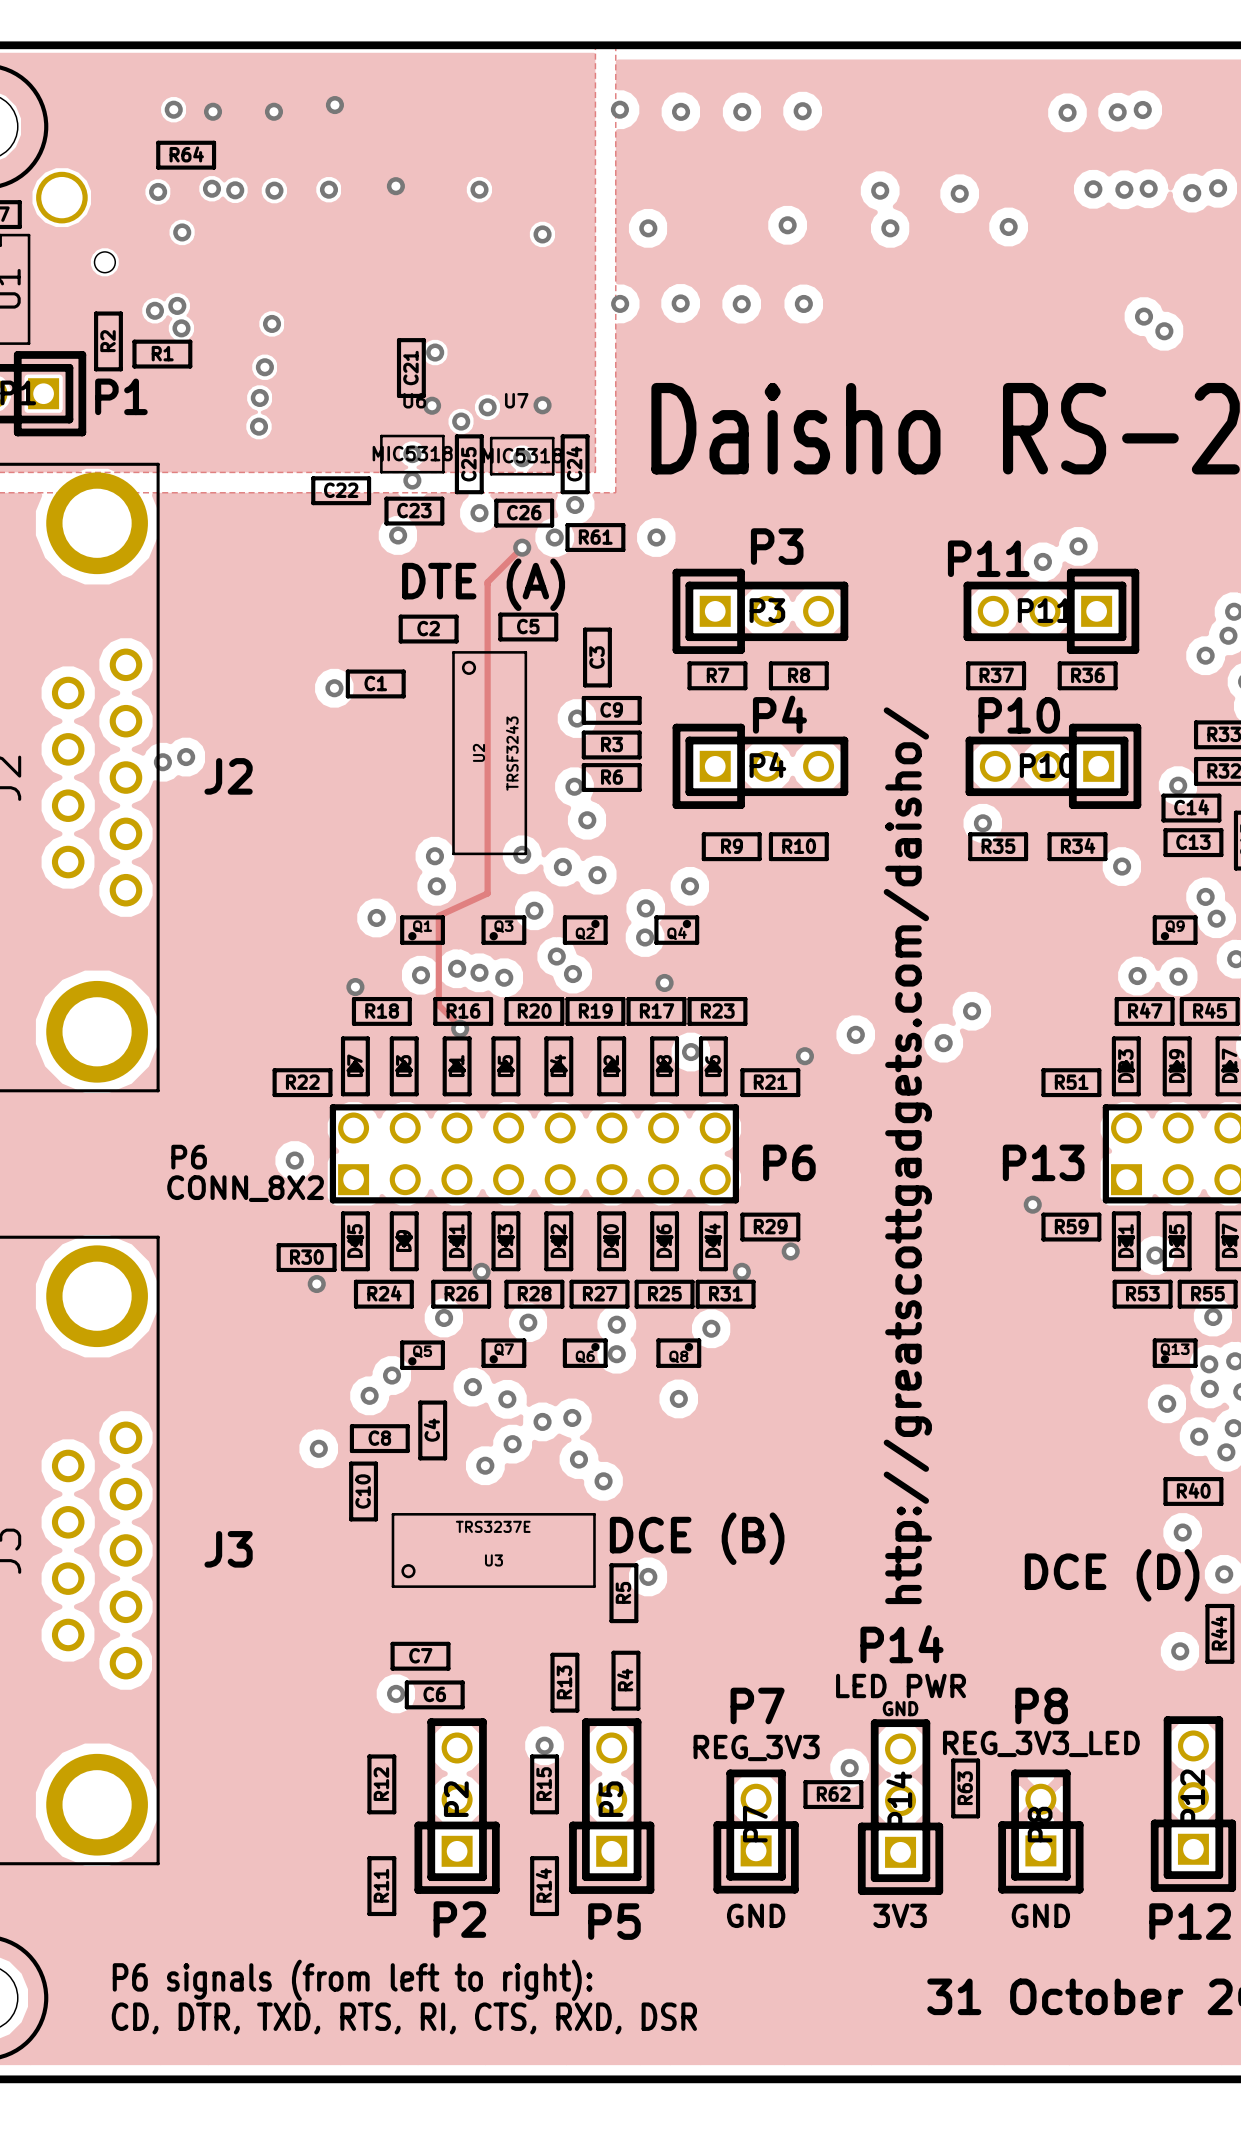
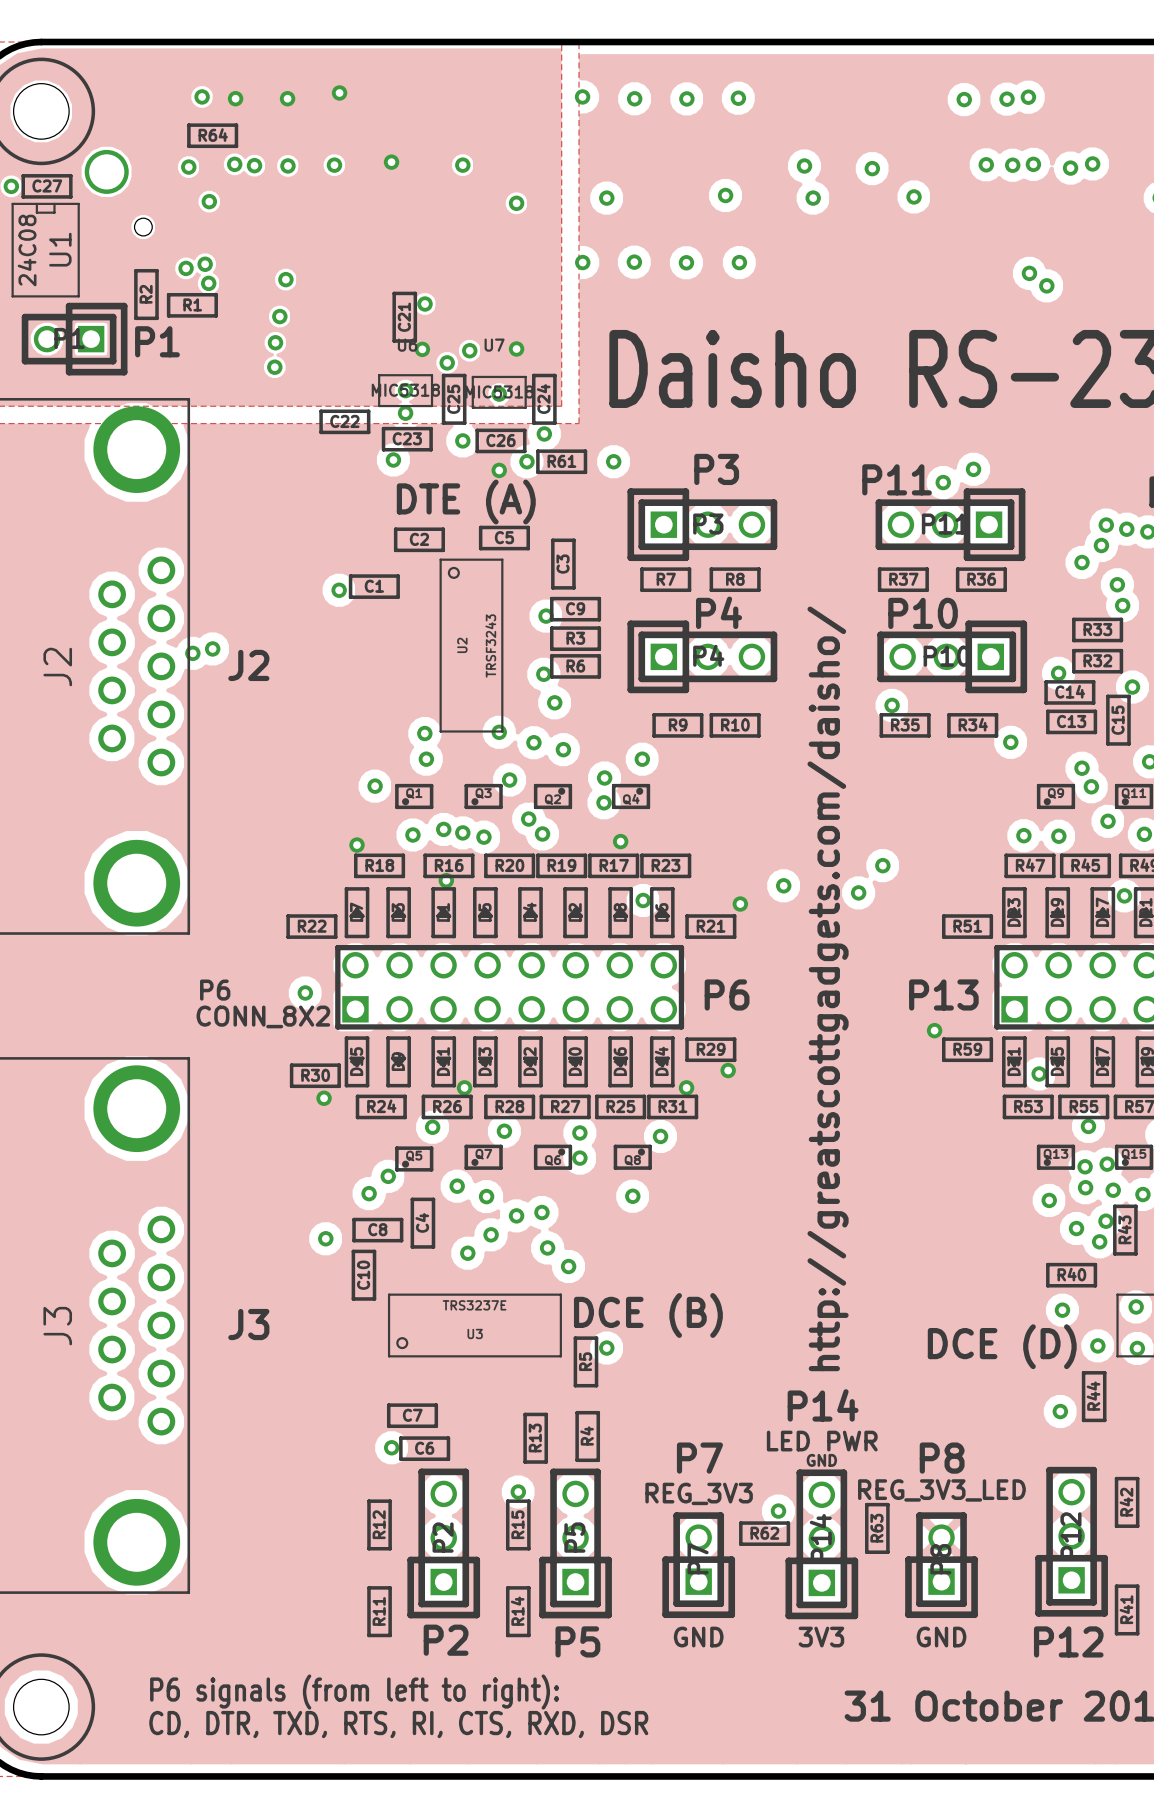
track: (522, 547) (487, 582) (487, 893) (438, 915) (438, 1005) (460, 1026) -> none

